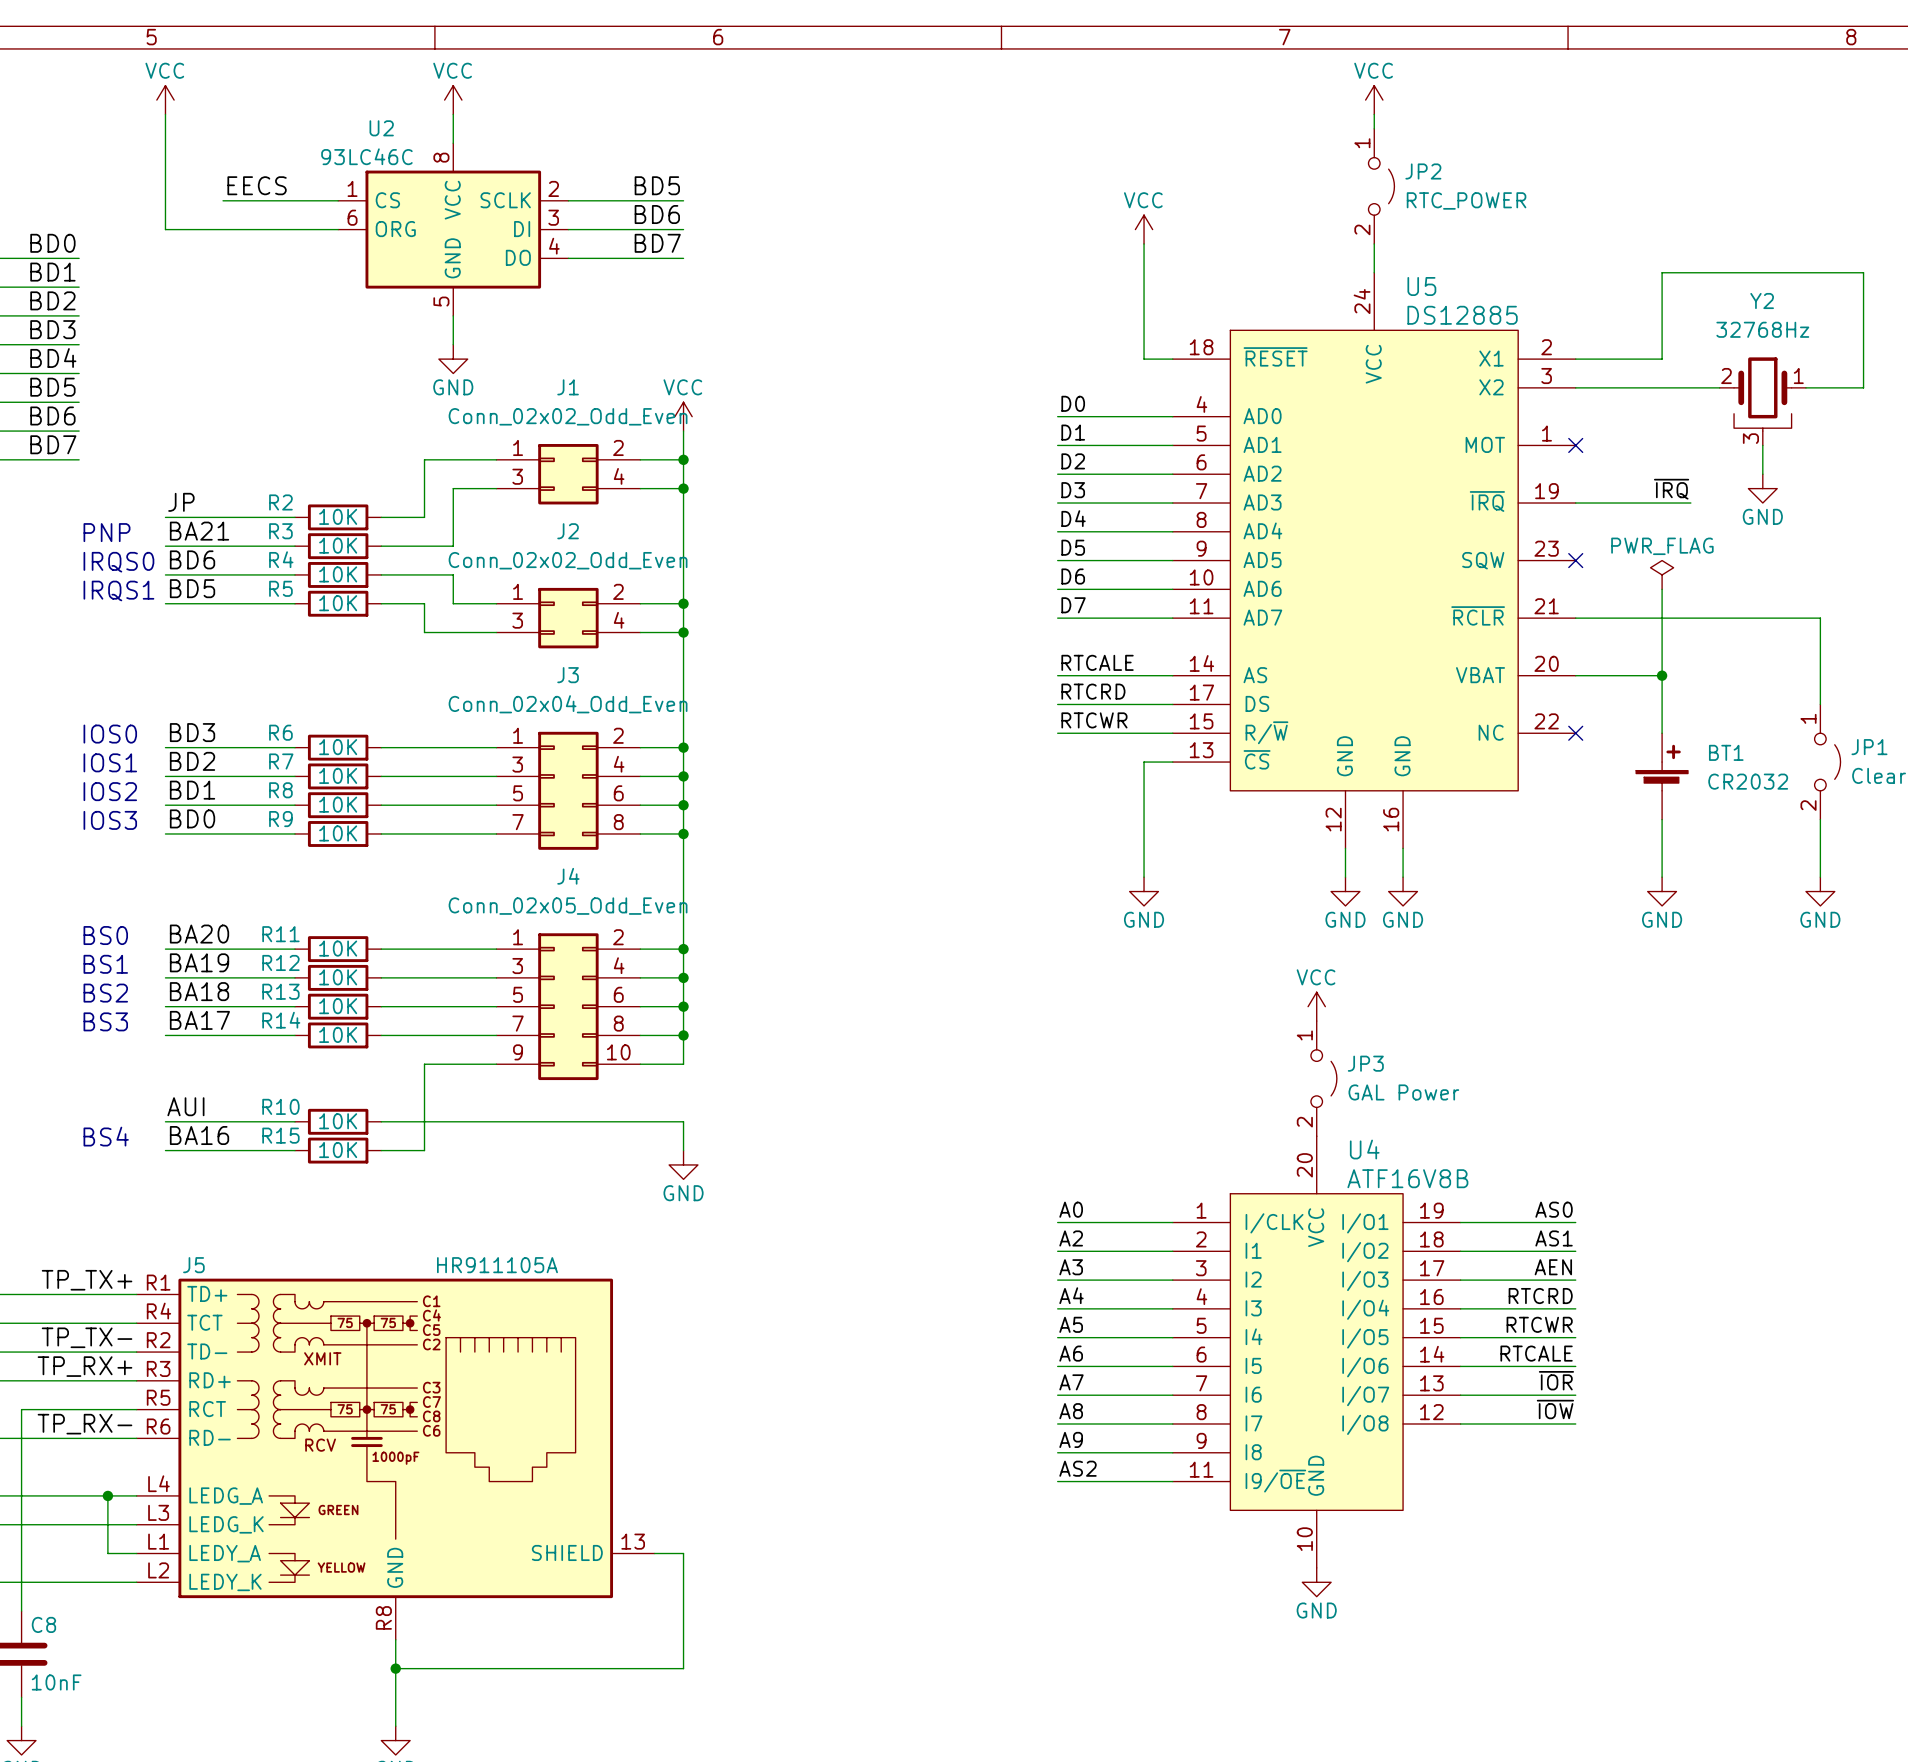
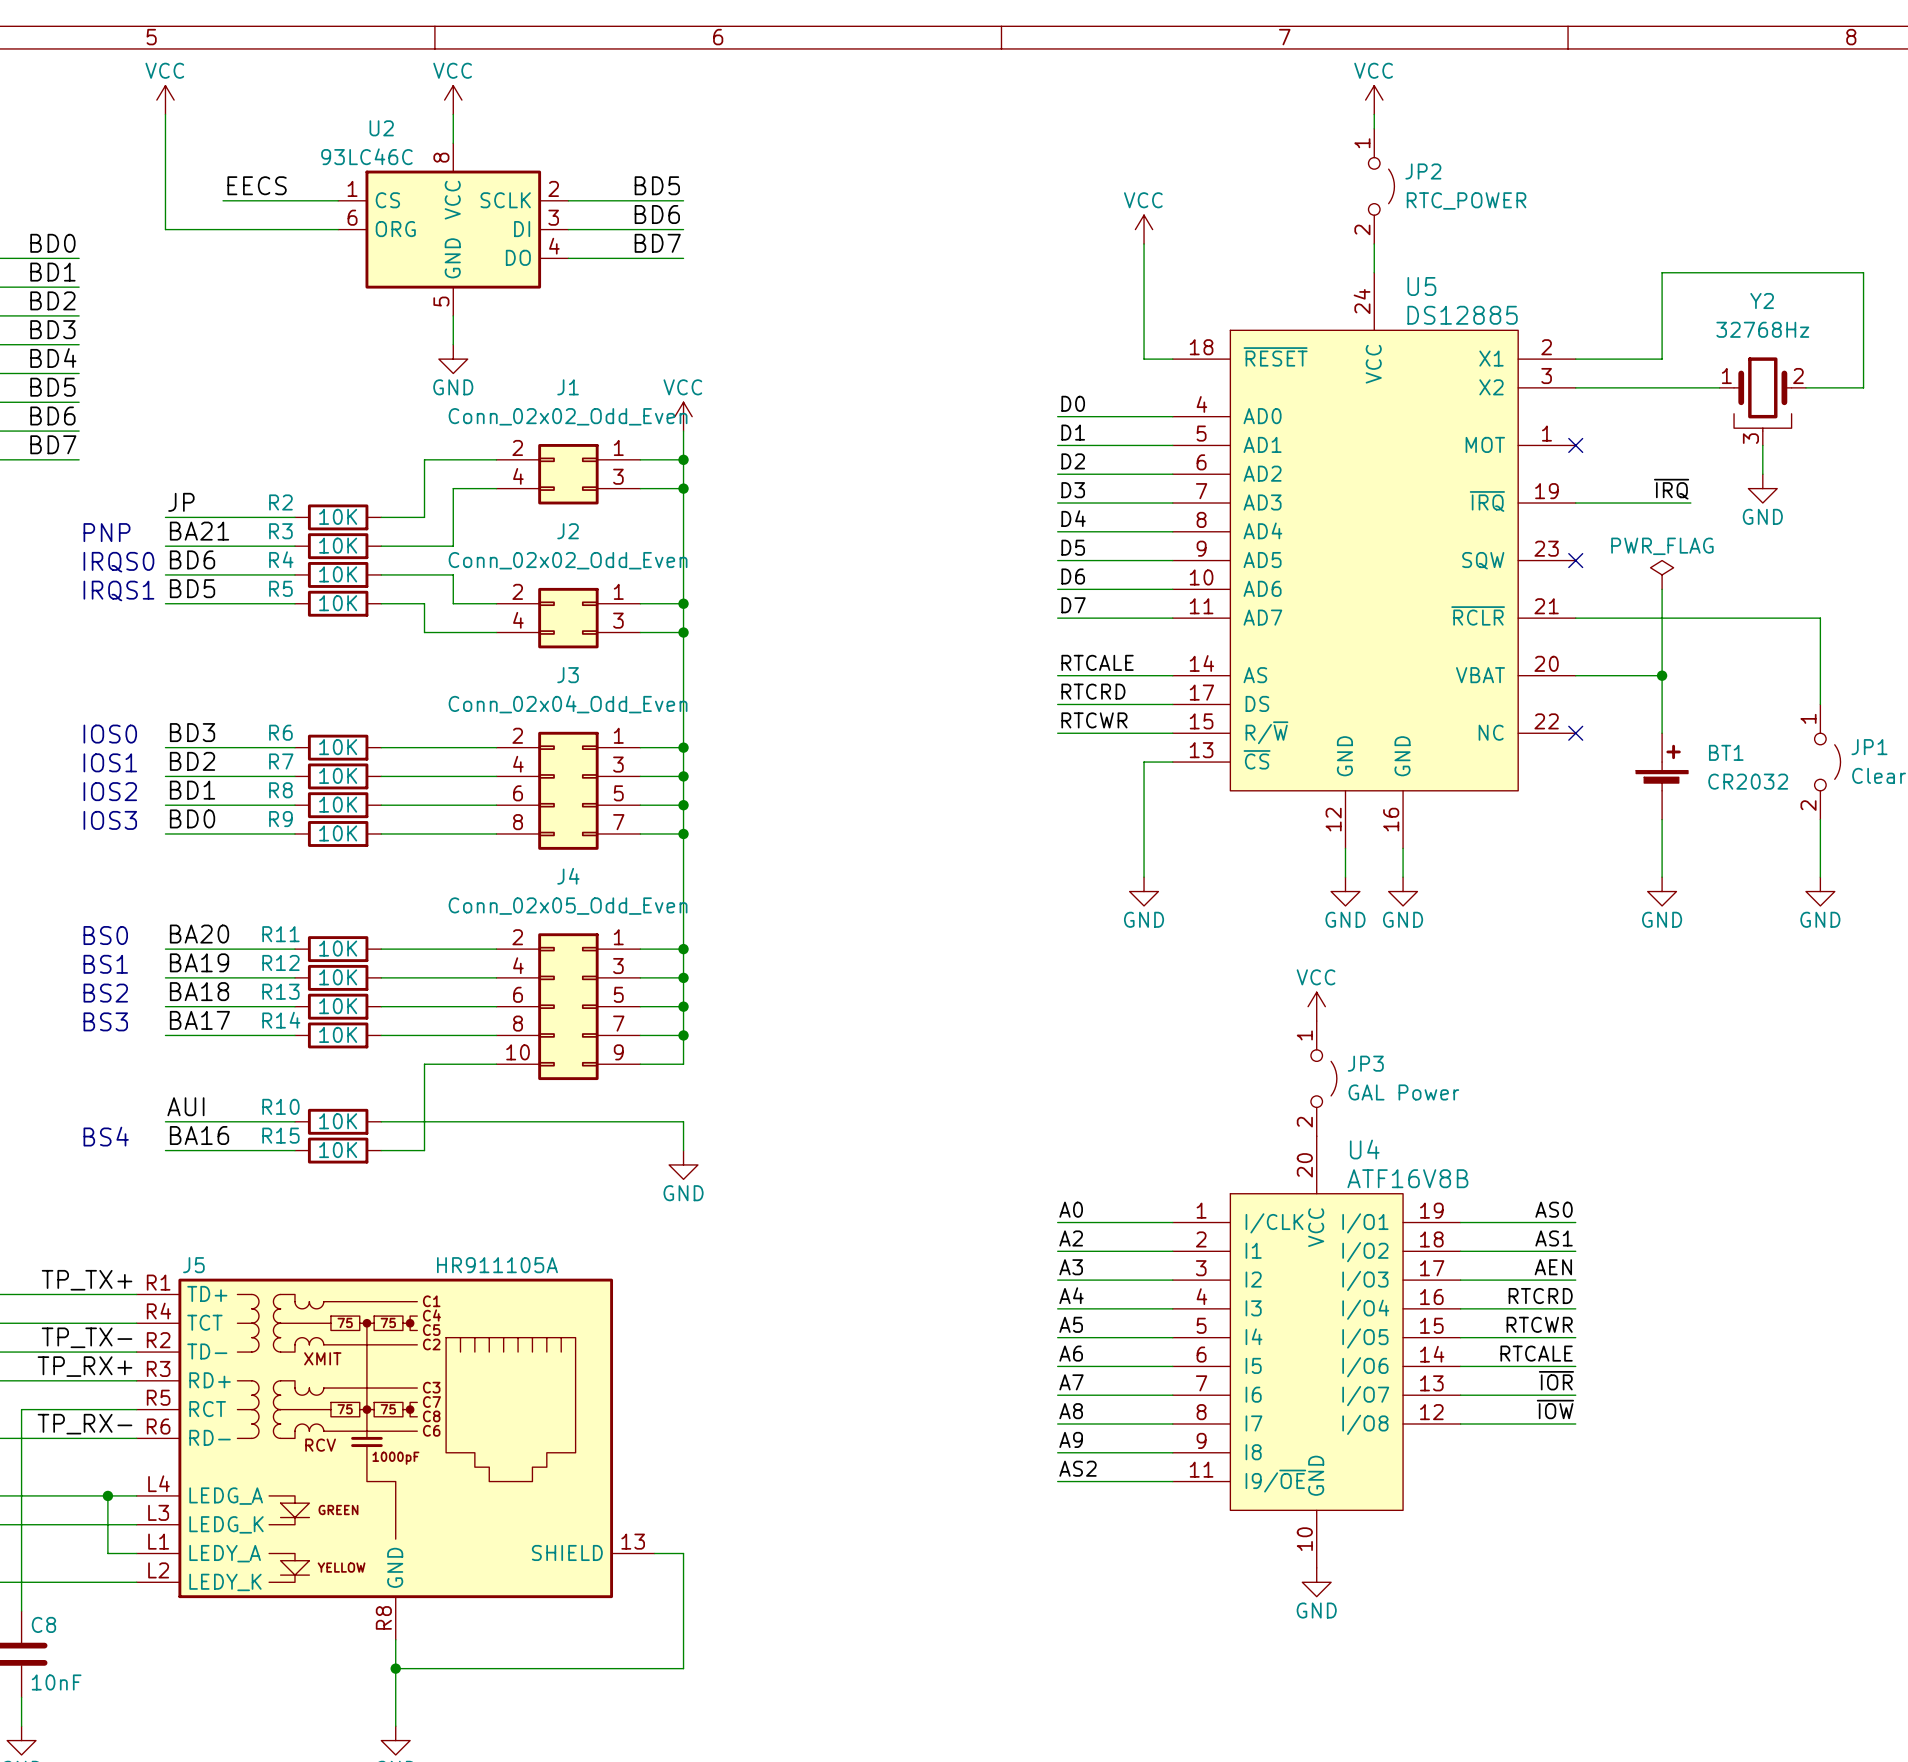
Y2 flip: as is (1762, 394) -> left-right (1762, 394)
J1 flip: as is (568, 474) -> left-right (568, 474)
J2 flip: as is (568, 618) -> left-right (568, 618)
J3 flip: as is (568, 790) -> left-right (568, 790)
J4 flip: as is (568, 1006) -> left-right (568, 1006)

